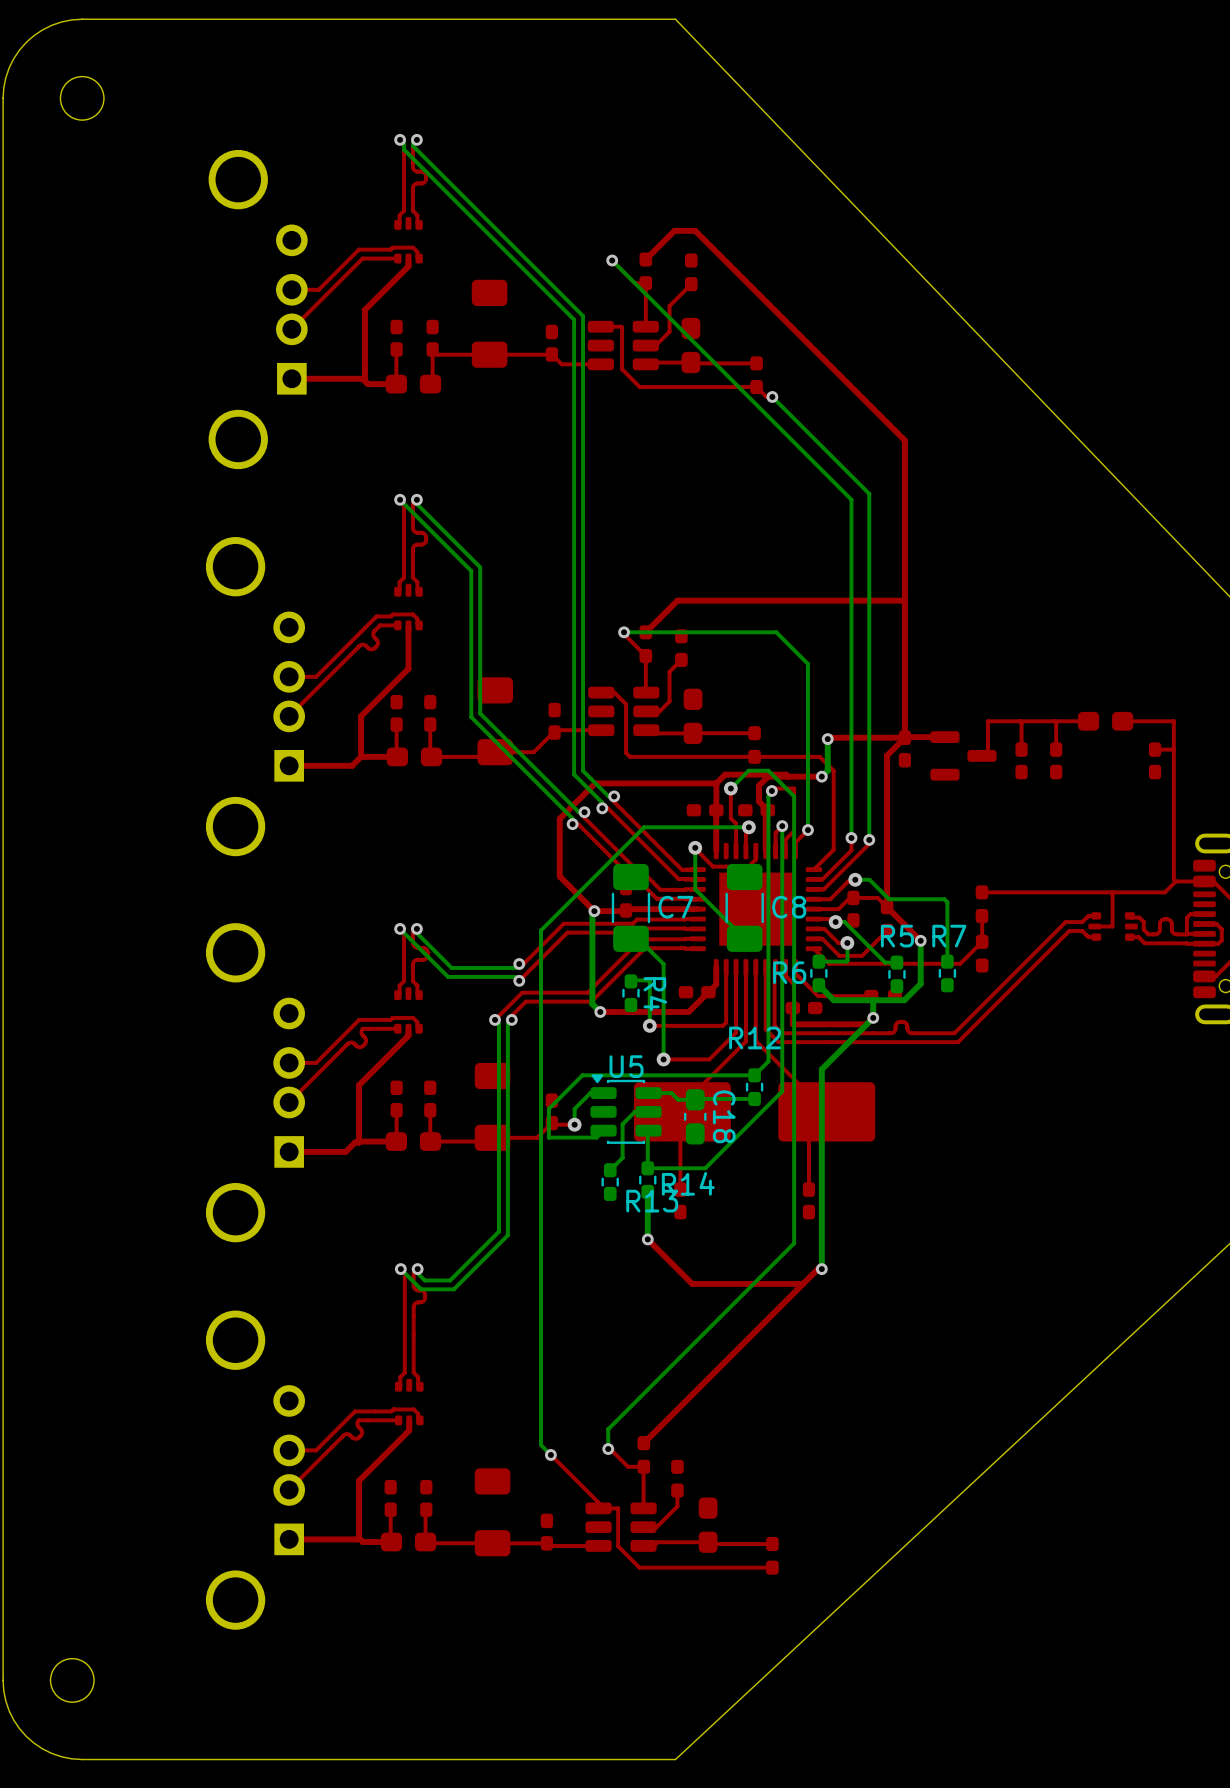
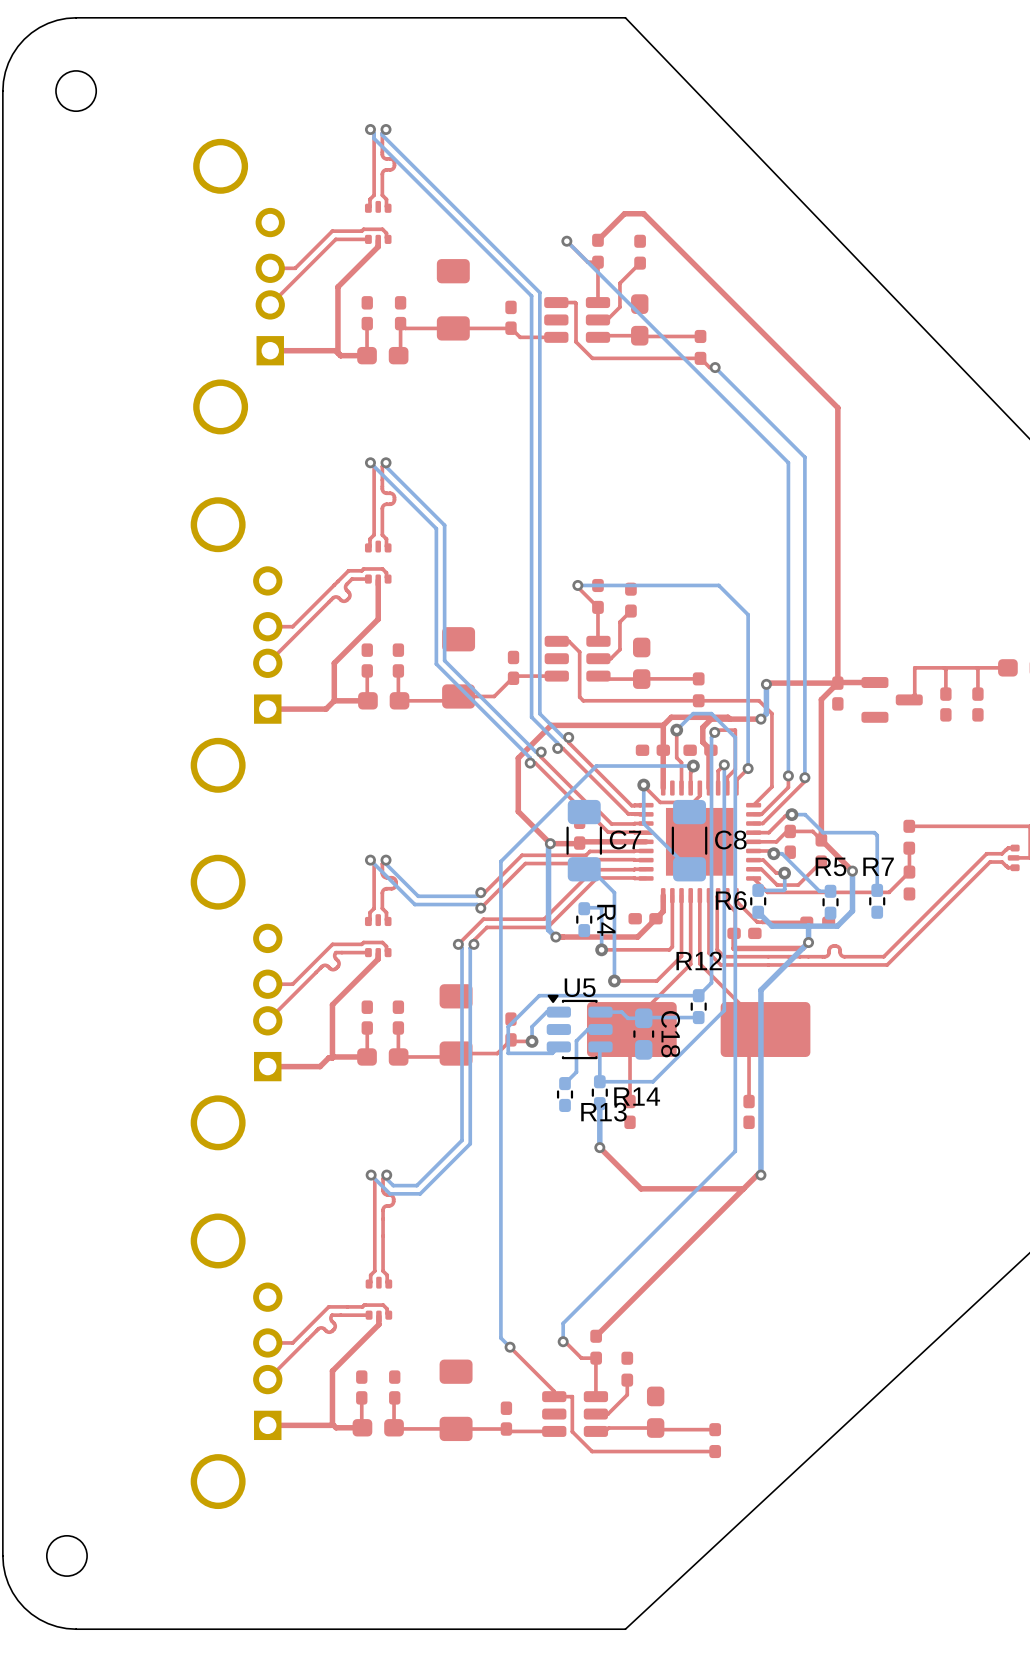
top track: (904, 600) (677, 600) (645, 632) -> none

